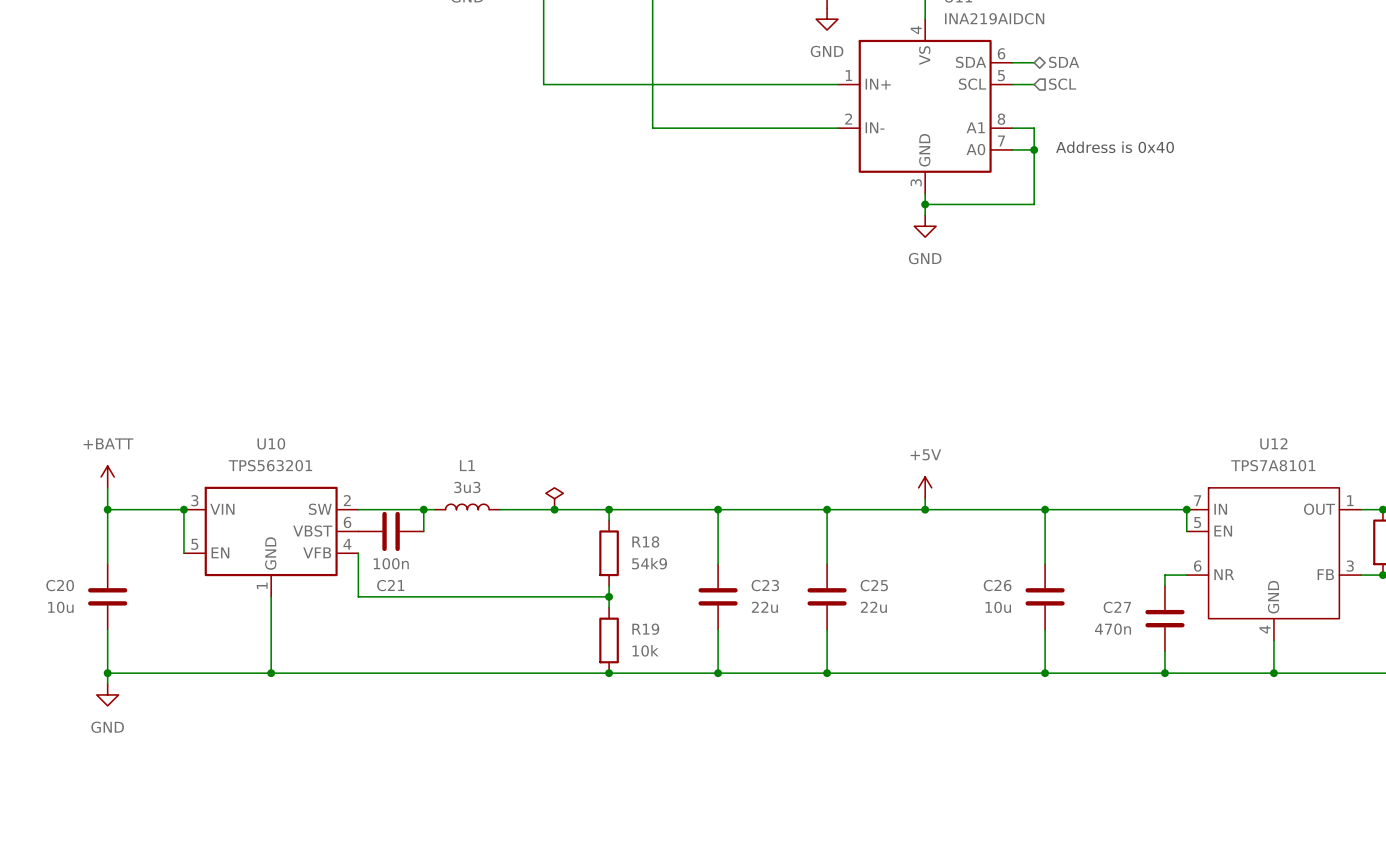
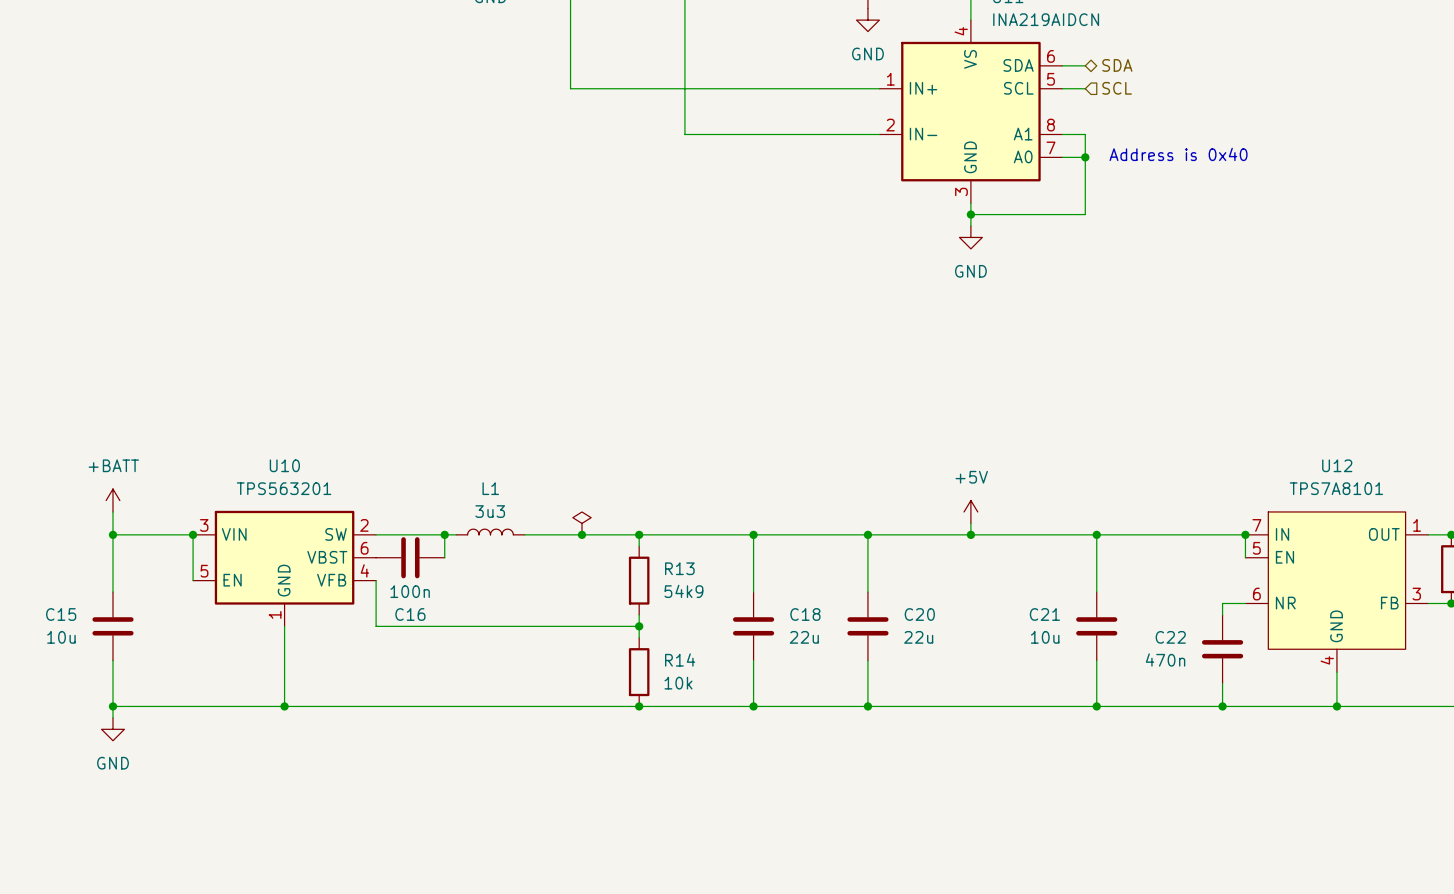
R18 name: R18 (645, 541) -> R13 (679, 568)
C20 name: C20 (60, 585) -> C15 (61, 614)
C21 name: C21 (390, 585) -> C16 (410, 614)
C23 name: C23 (765, 585) -> C18 (805, 614)
C25 name: C25 (874, 585) -> C20 (919, 614)
C26 name: C26 (997, 585) -> C21 (1044, 614)
C27 name: C27 (1117, 607) -> C22 (1170, 637)
R19 name: R19 (645, 629) -> R14 (680, 659)

